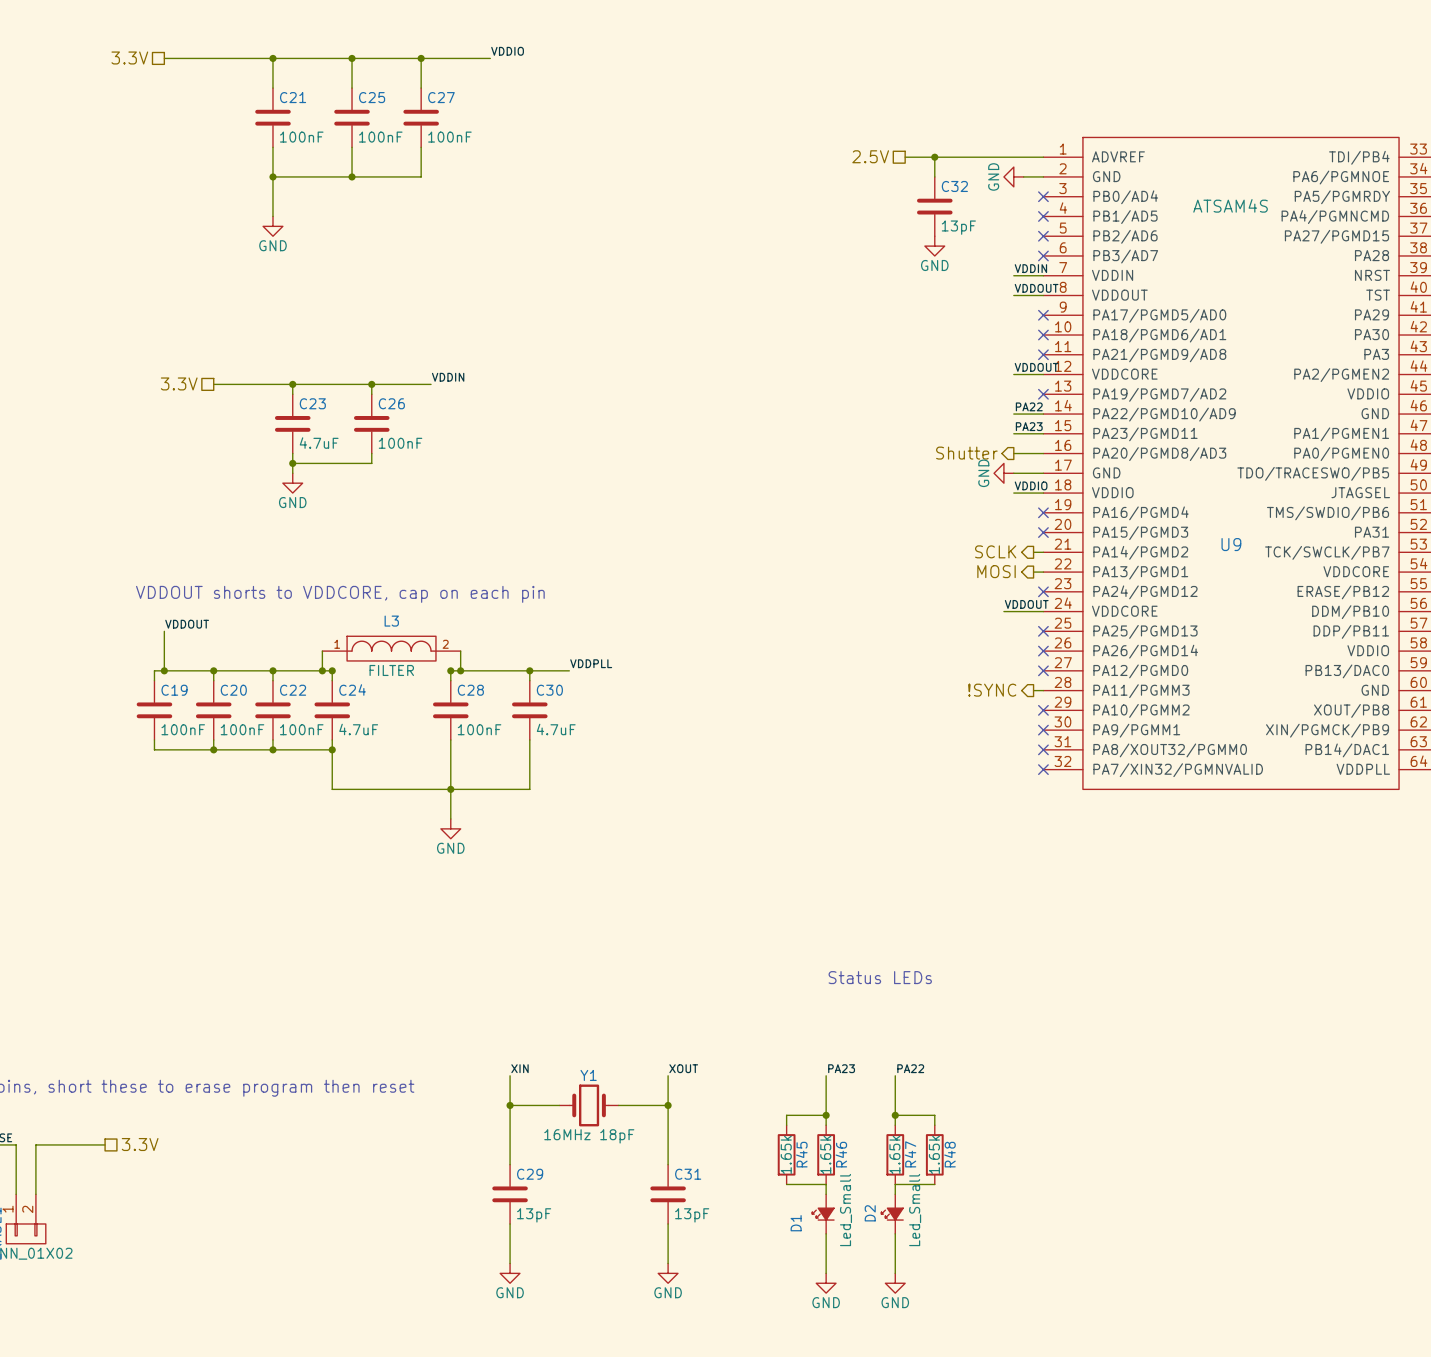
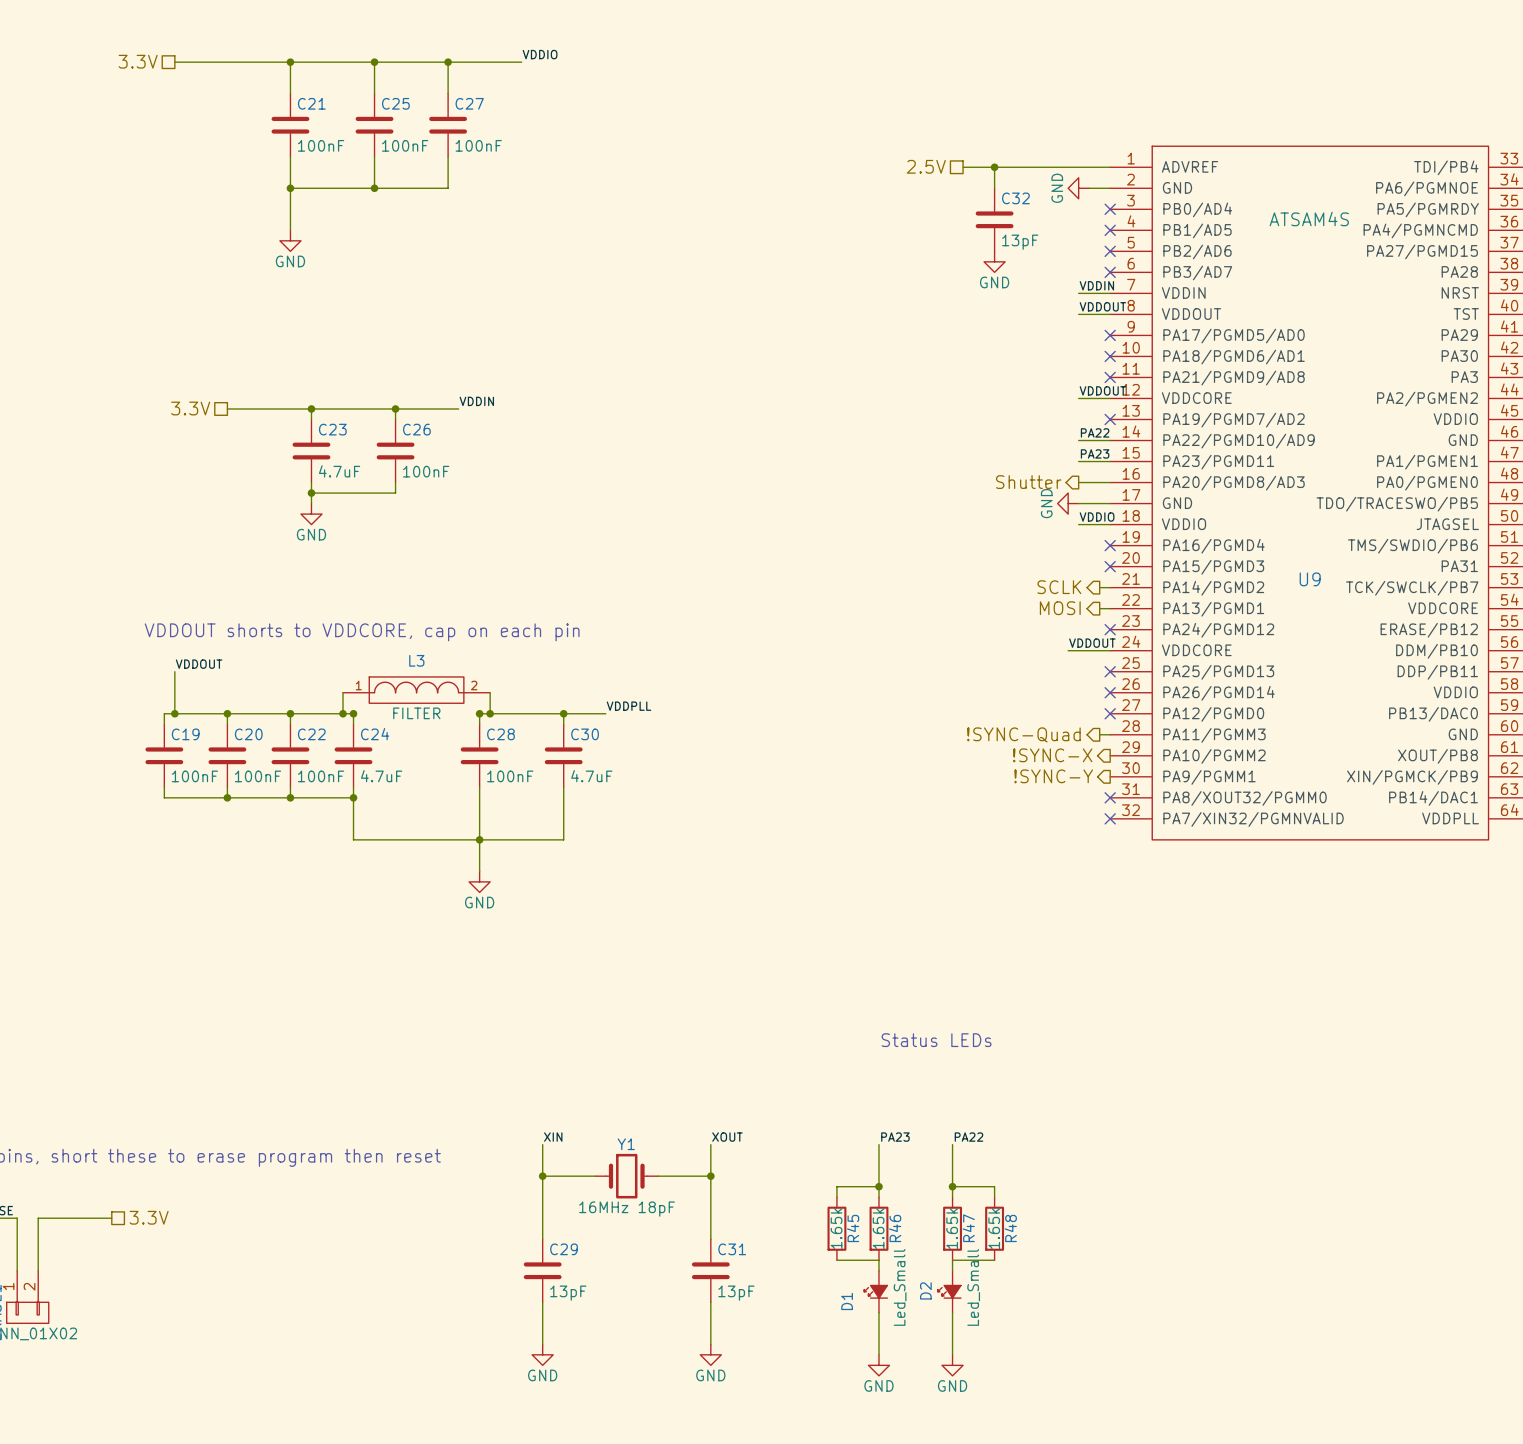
hierarchical label: !SYNC (992, 690) -> !SYNC-Quad (1023, 734)
hierarchical label: none -> !SYNC-X (1052, 755)
no-connect mark: (1043, 710) -> none
hierarchical label: none -> !SYNC-Y (1053, 776)
no-connect mark: (1043, 730) -> none

